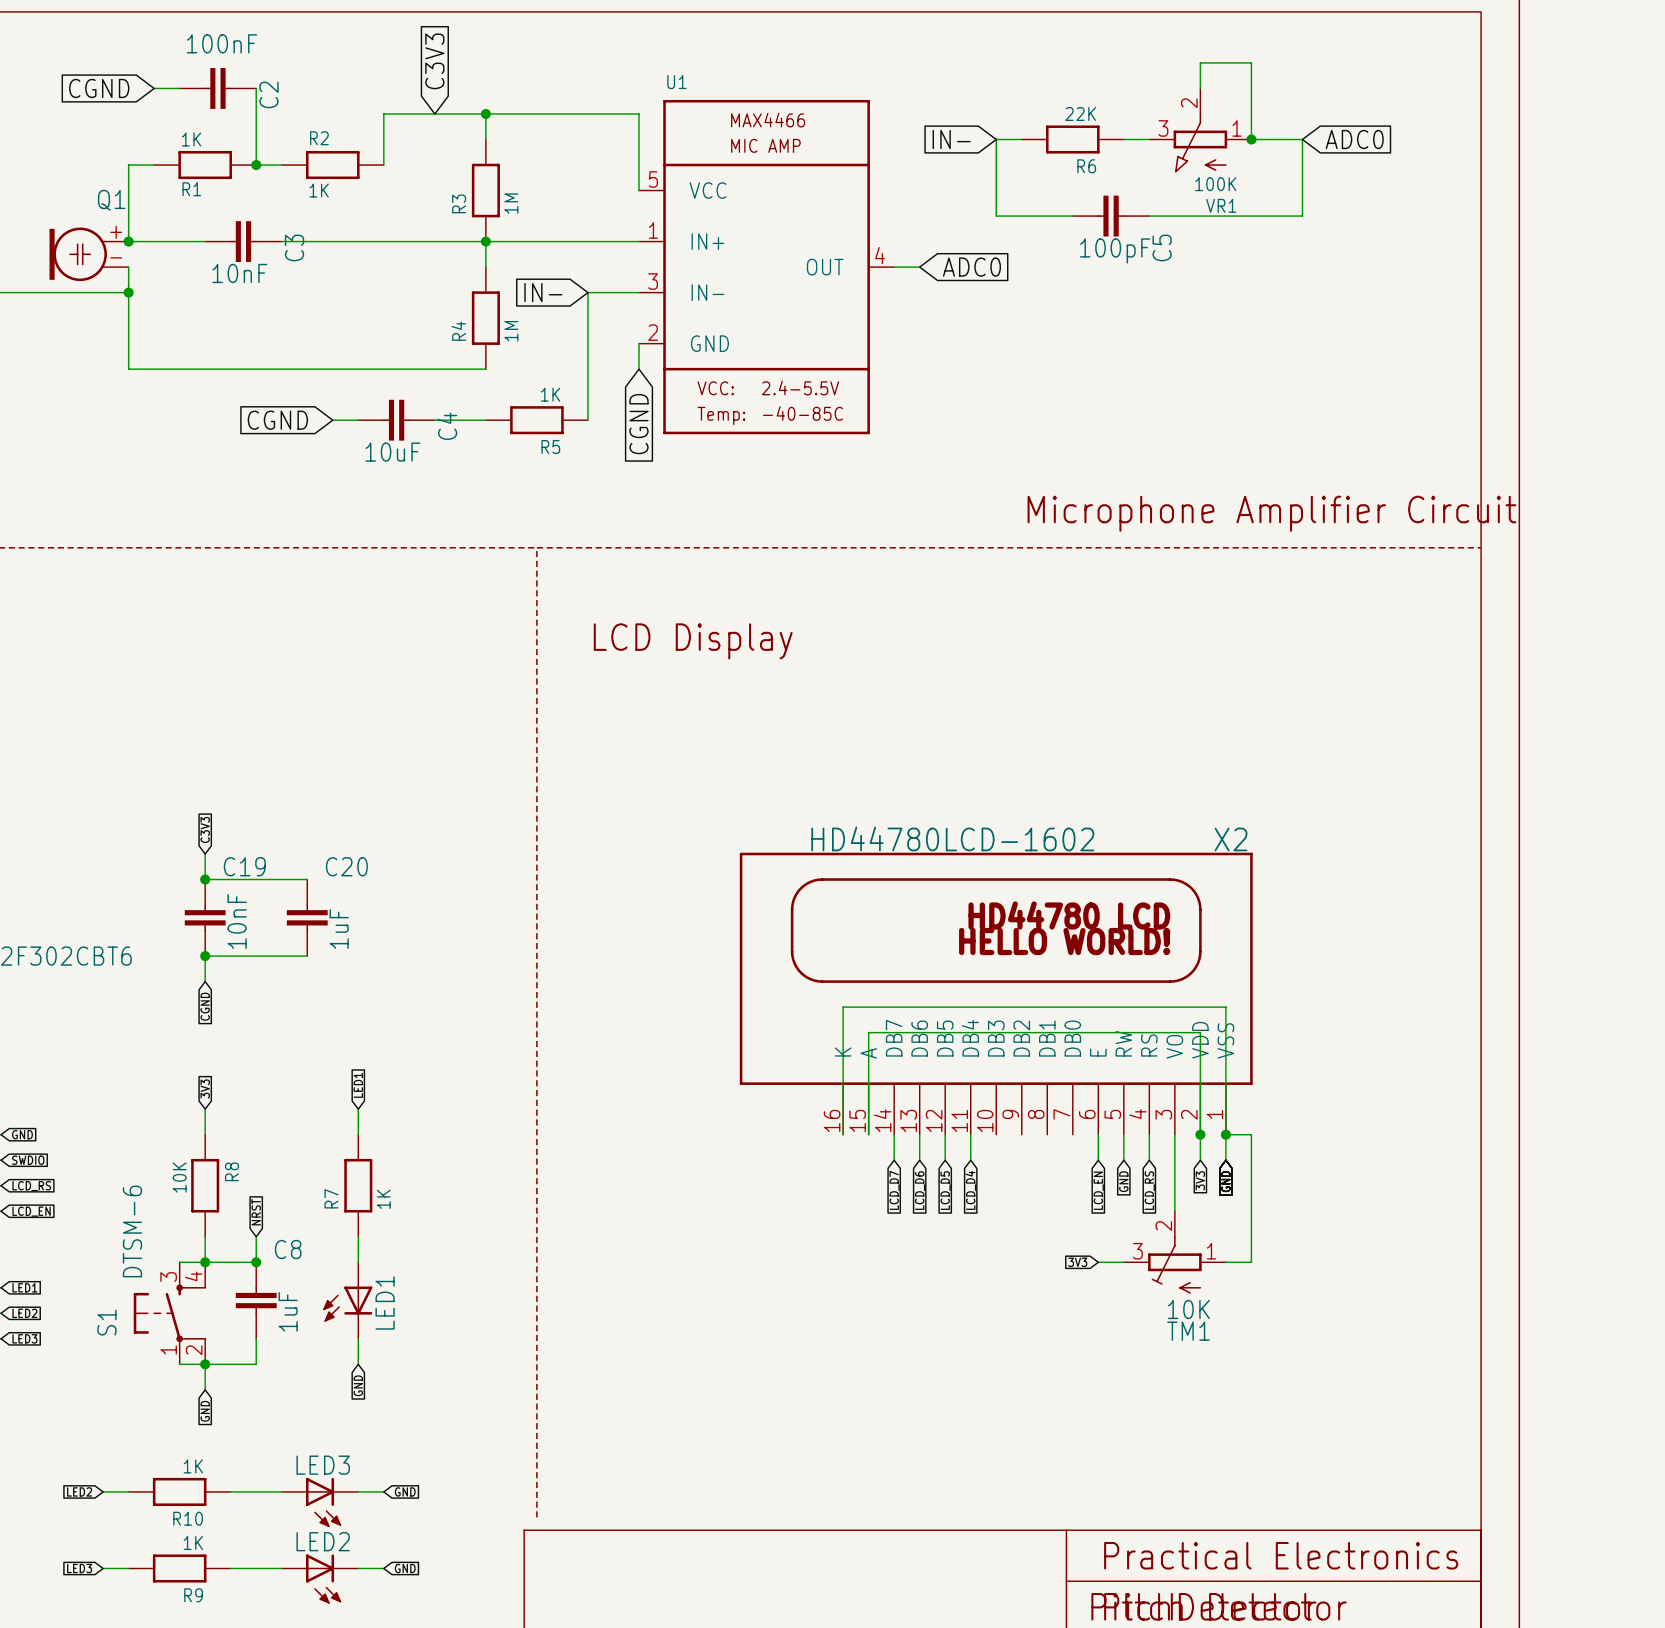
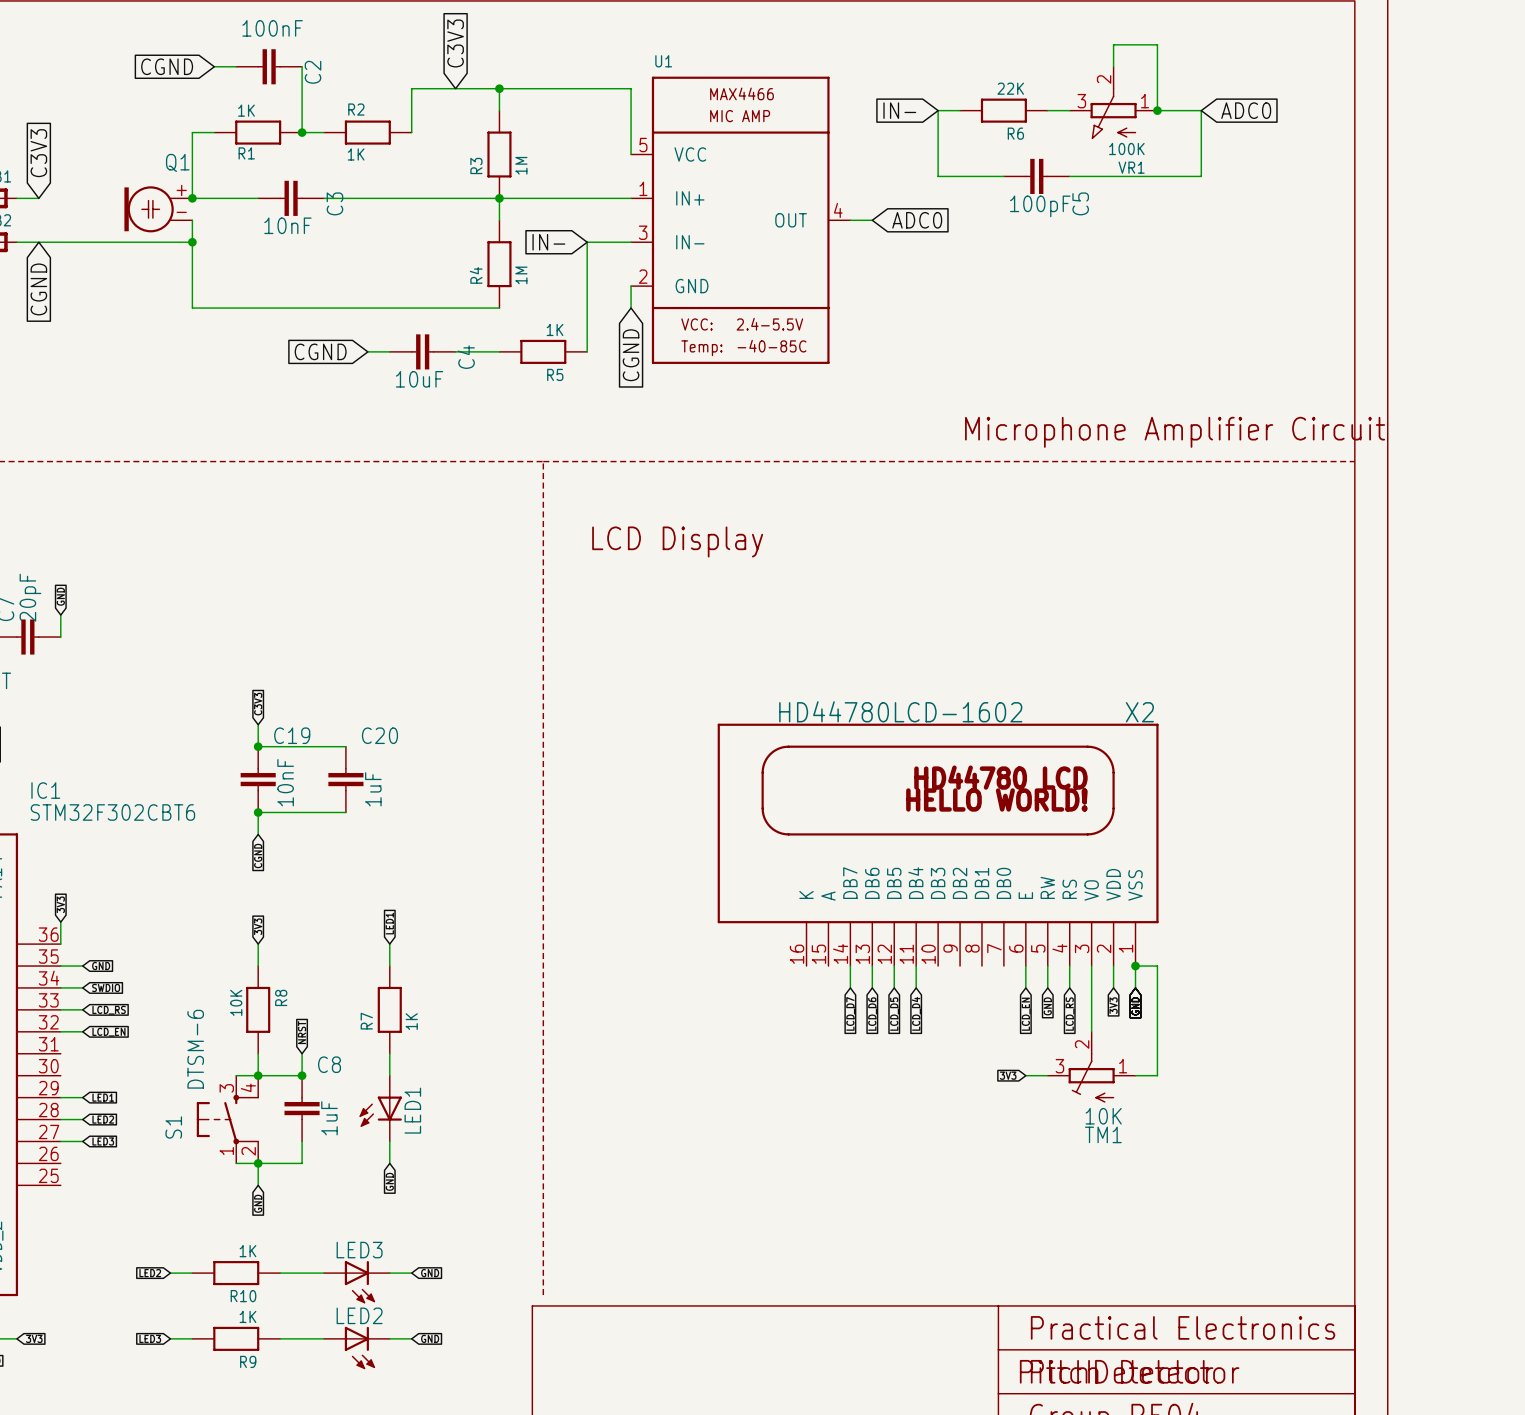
wire: (843, 1134) (843, 1007) (1225, 1007) (1225, 1134) -> none
wire: (868, 1134) (868, 1032) (1200, 1032) (1200, 1134) -> none
junction: (1200, 1134) -> none

